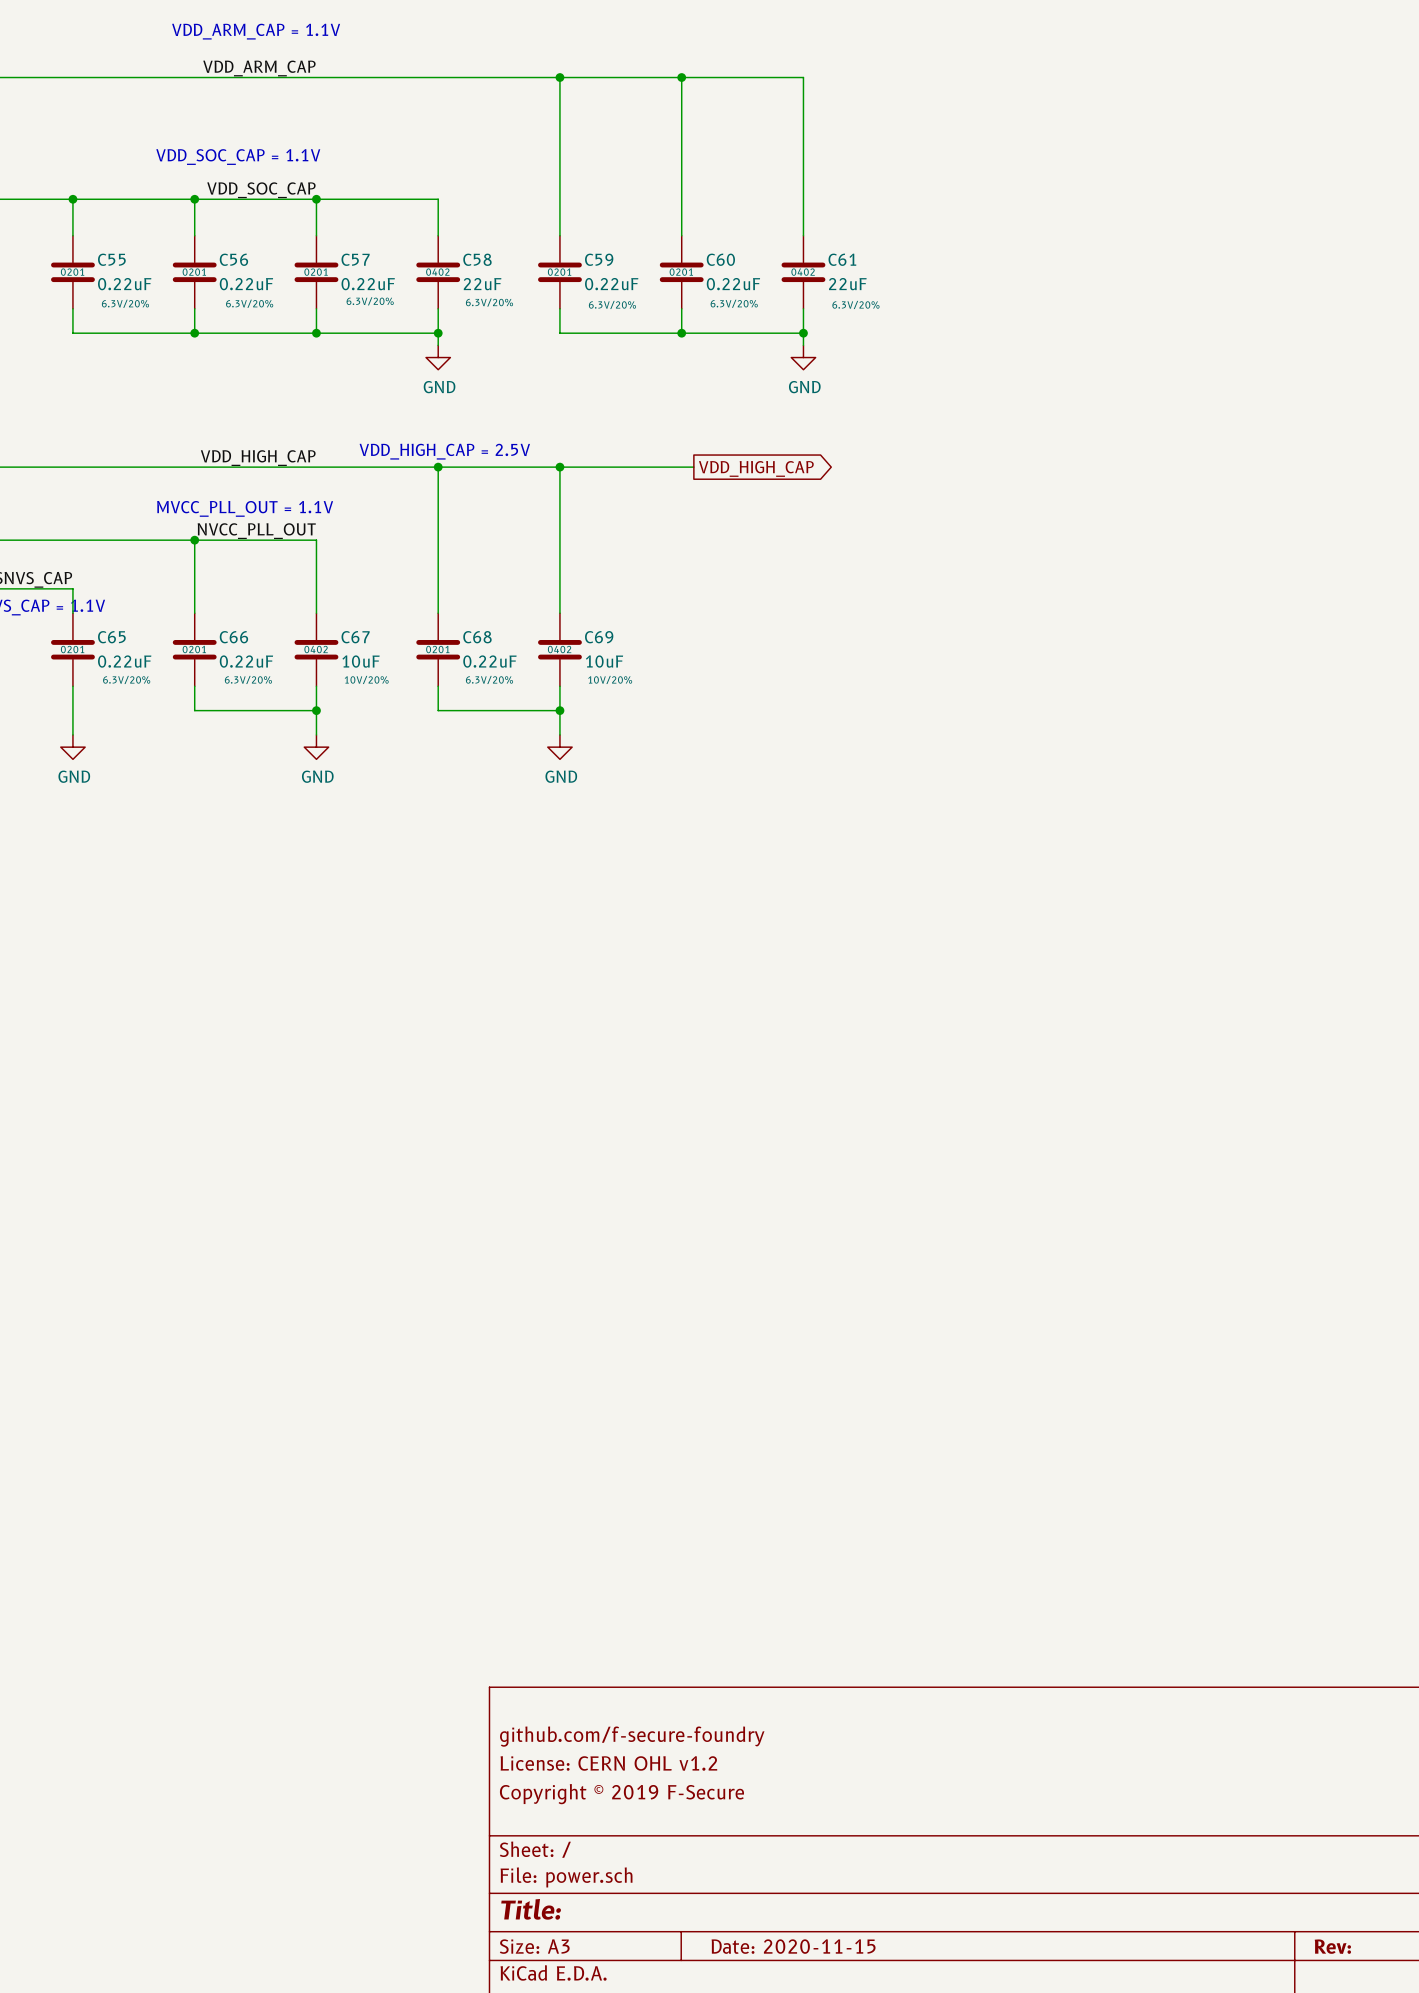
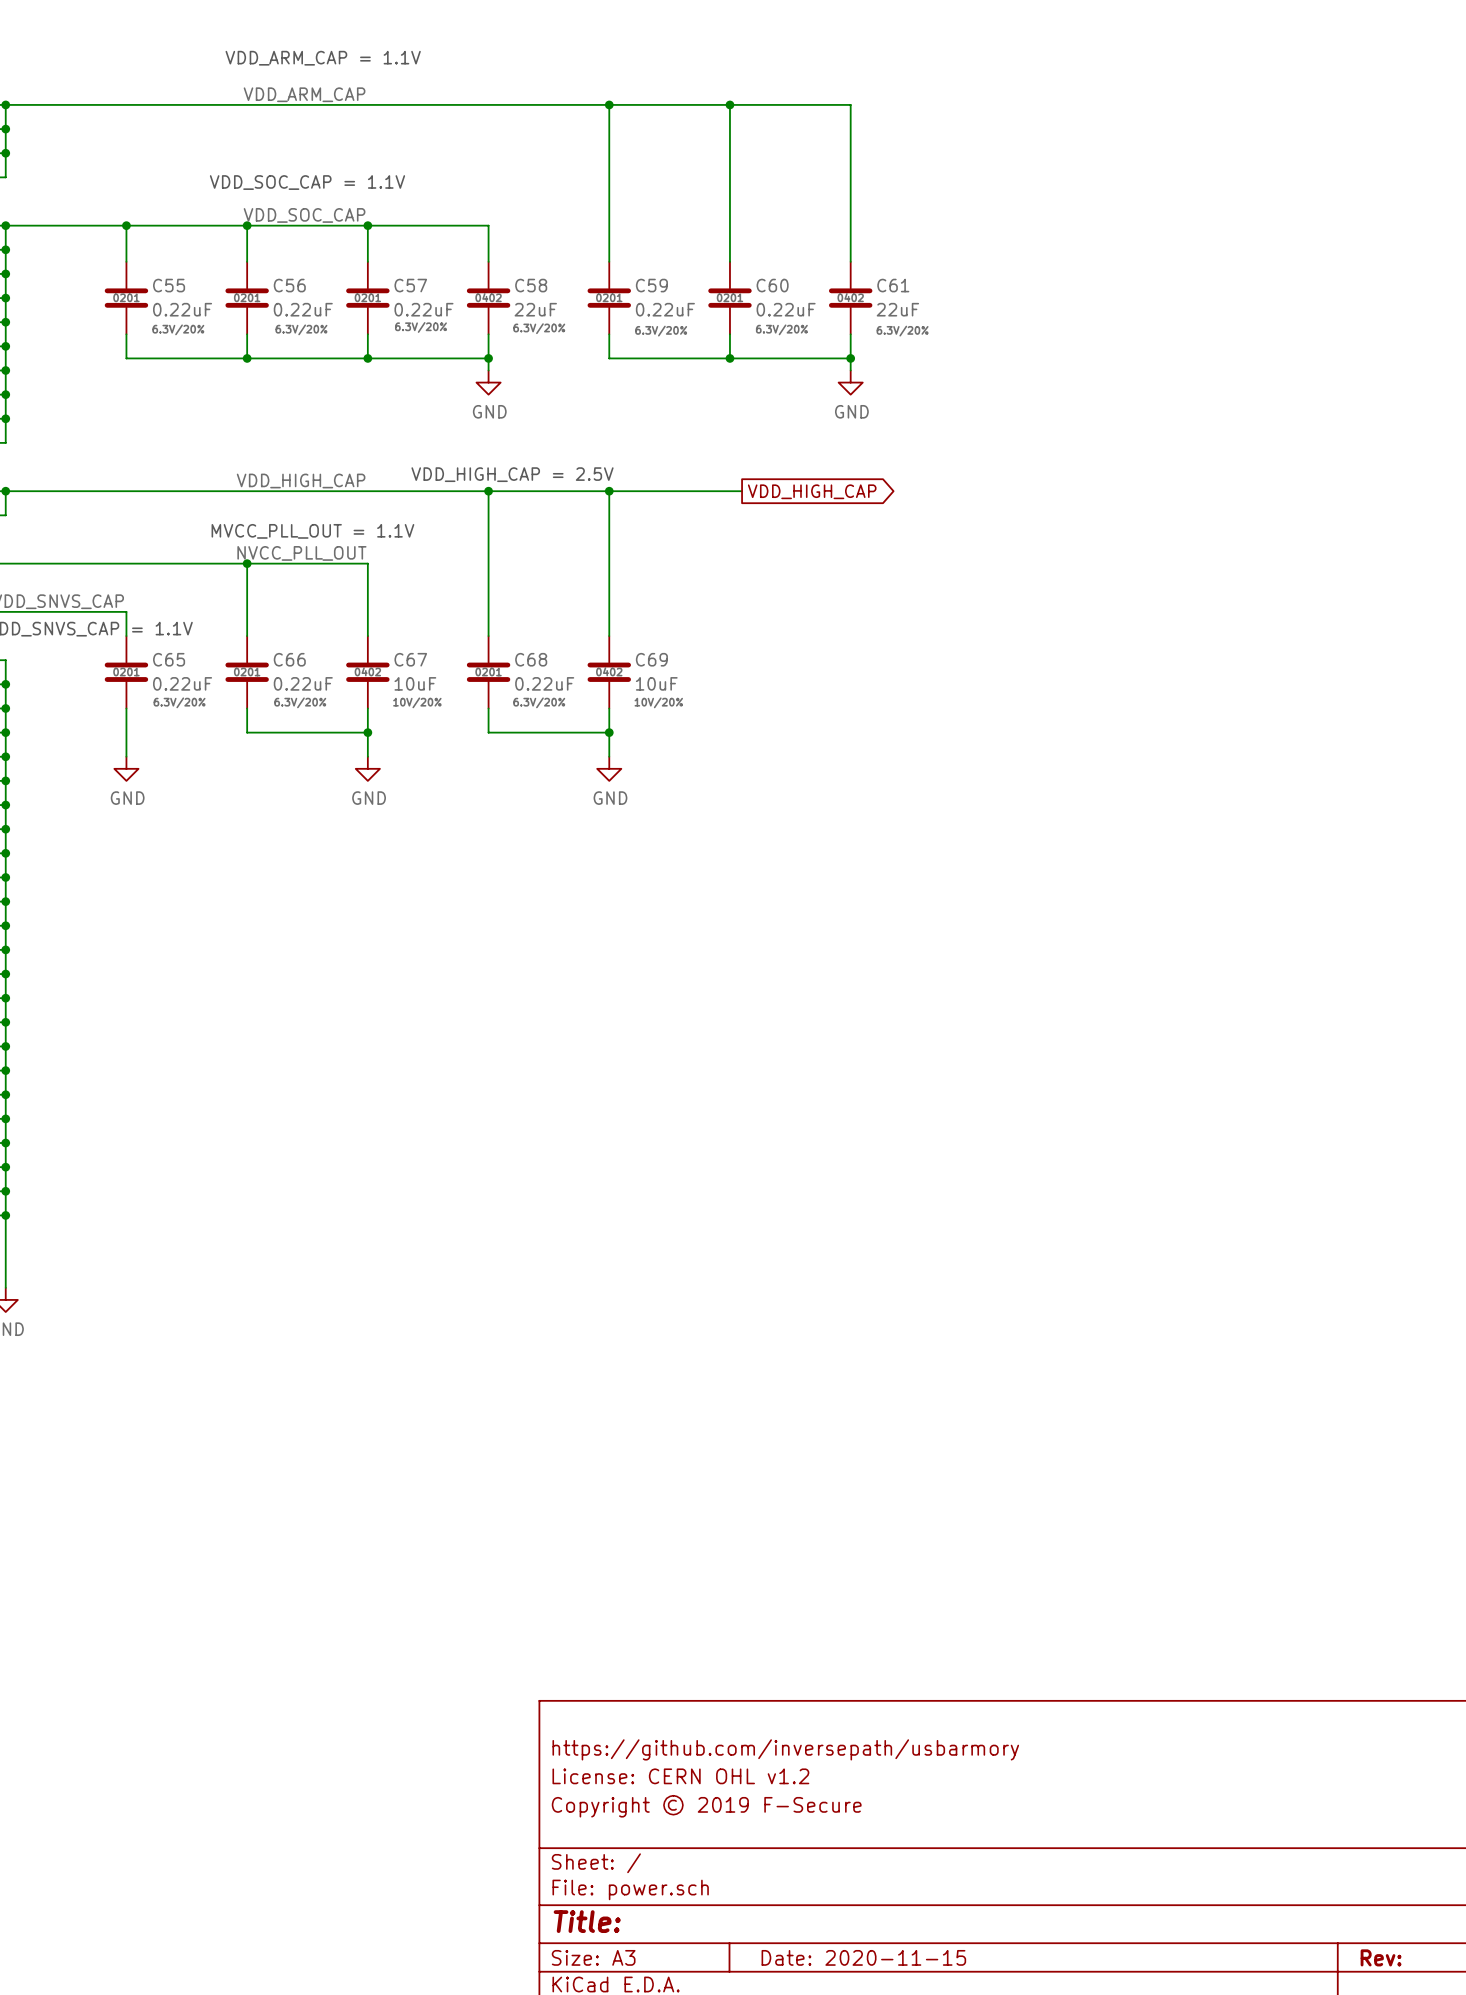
title block: github.com/f-secure-foundry (632, 1736) -> https://github.com/inversepath/usbarmory (785, 1749)

